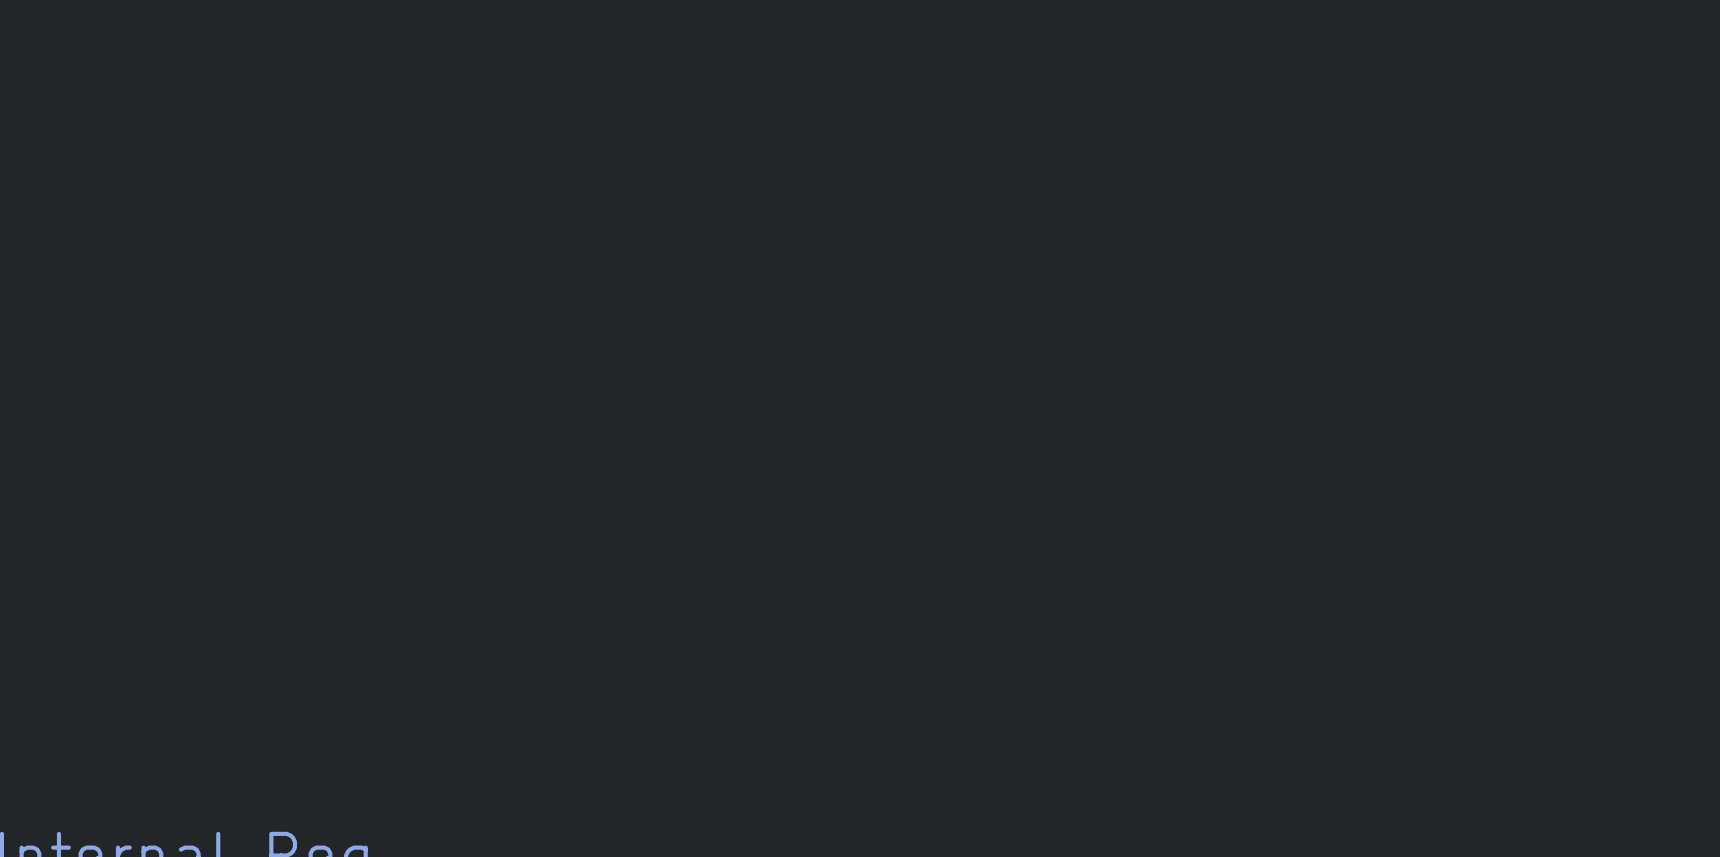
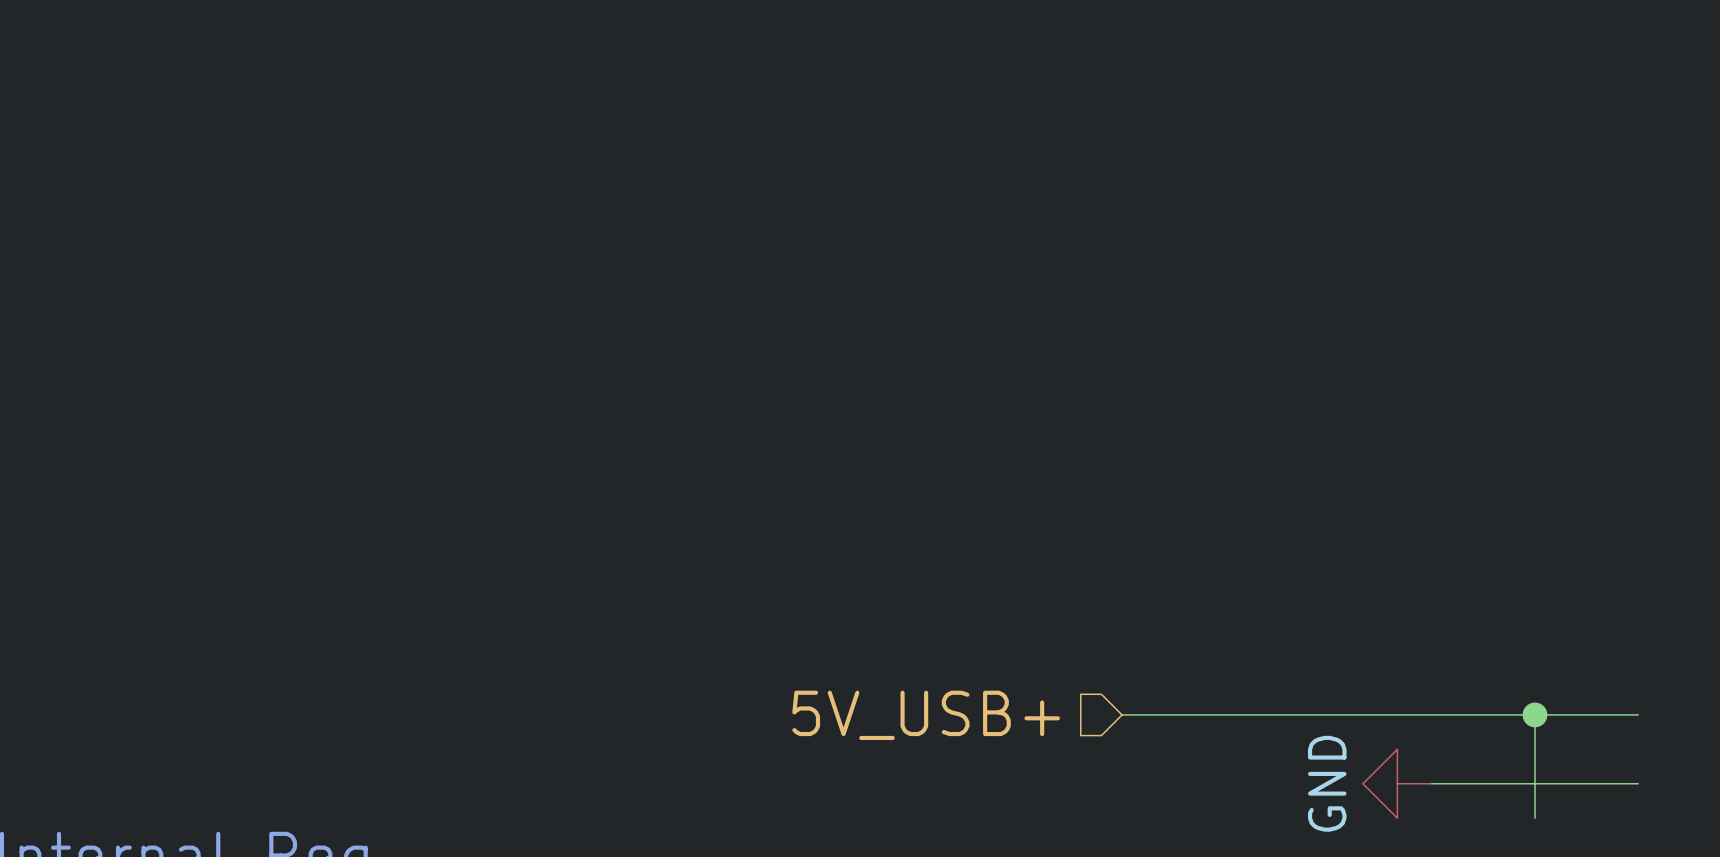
wire: none -> (1122, 714) (1638, 714)
wire: none -> (1535, 714) (1535, 818)
junction: none -> (1535, 714)
hierarchical label: none -> 5V_USB+ (926, 715)
power symbol: none -> GND (1397, 783)
wire: none -> (1431, 783) (1638, 783)

